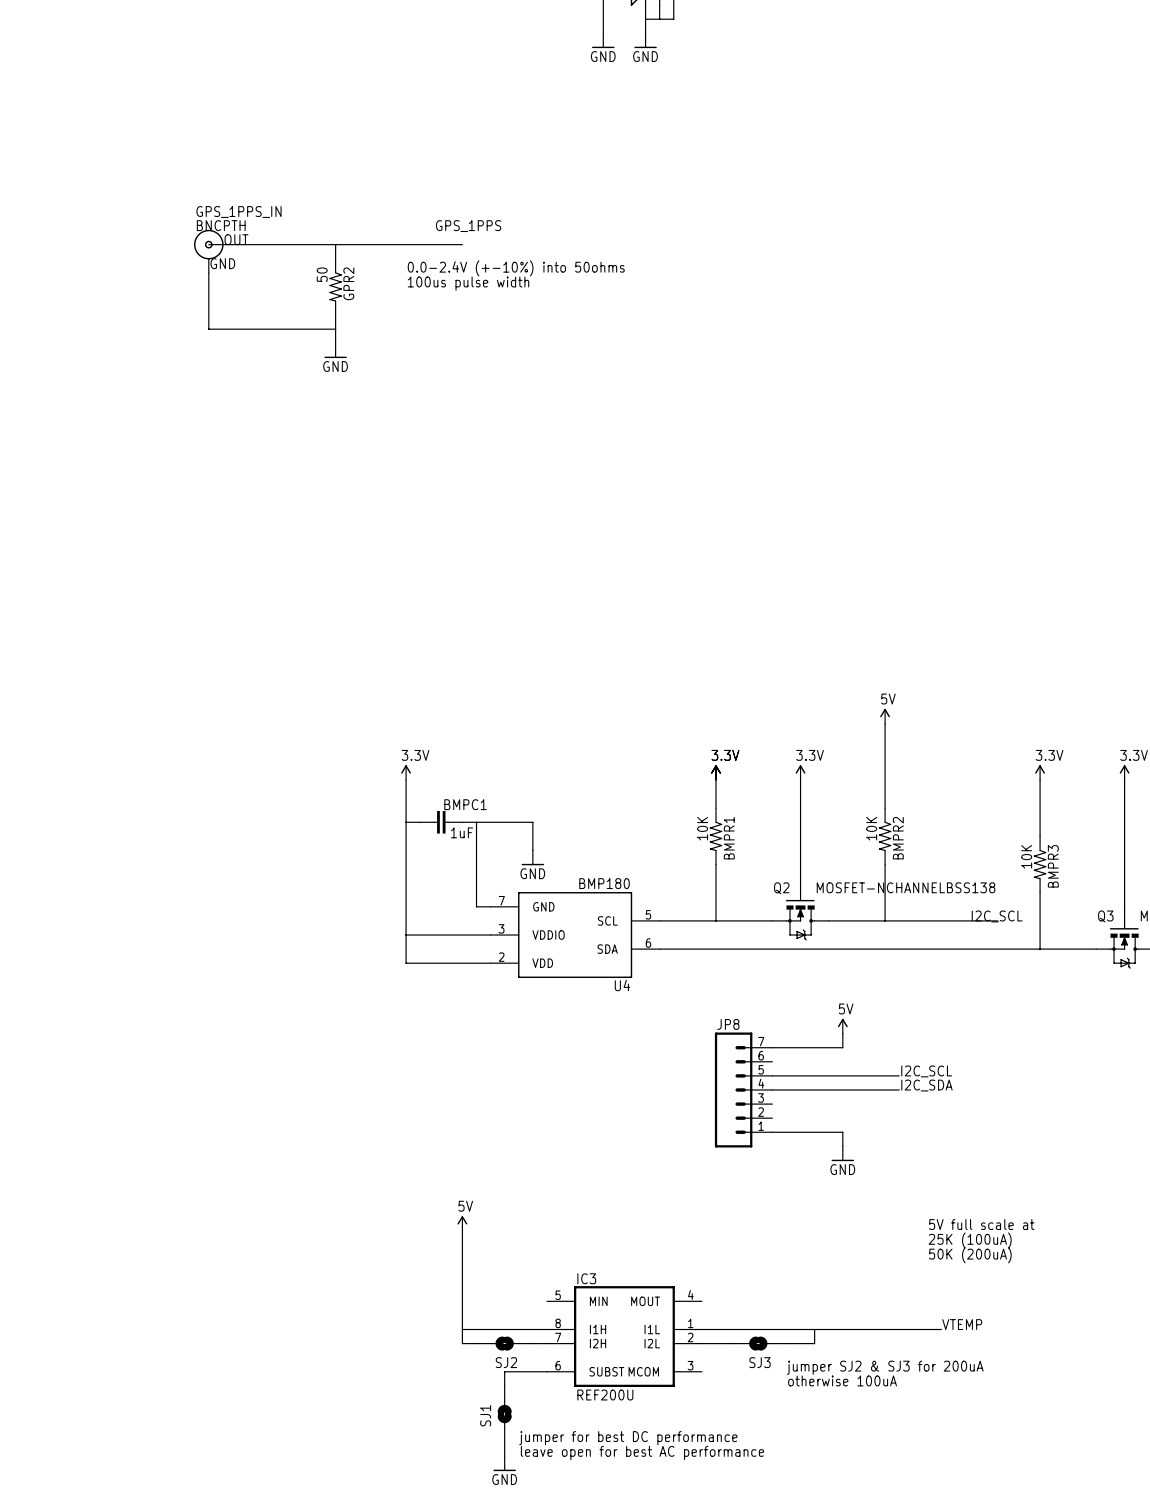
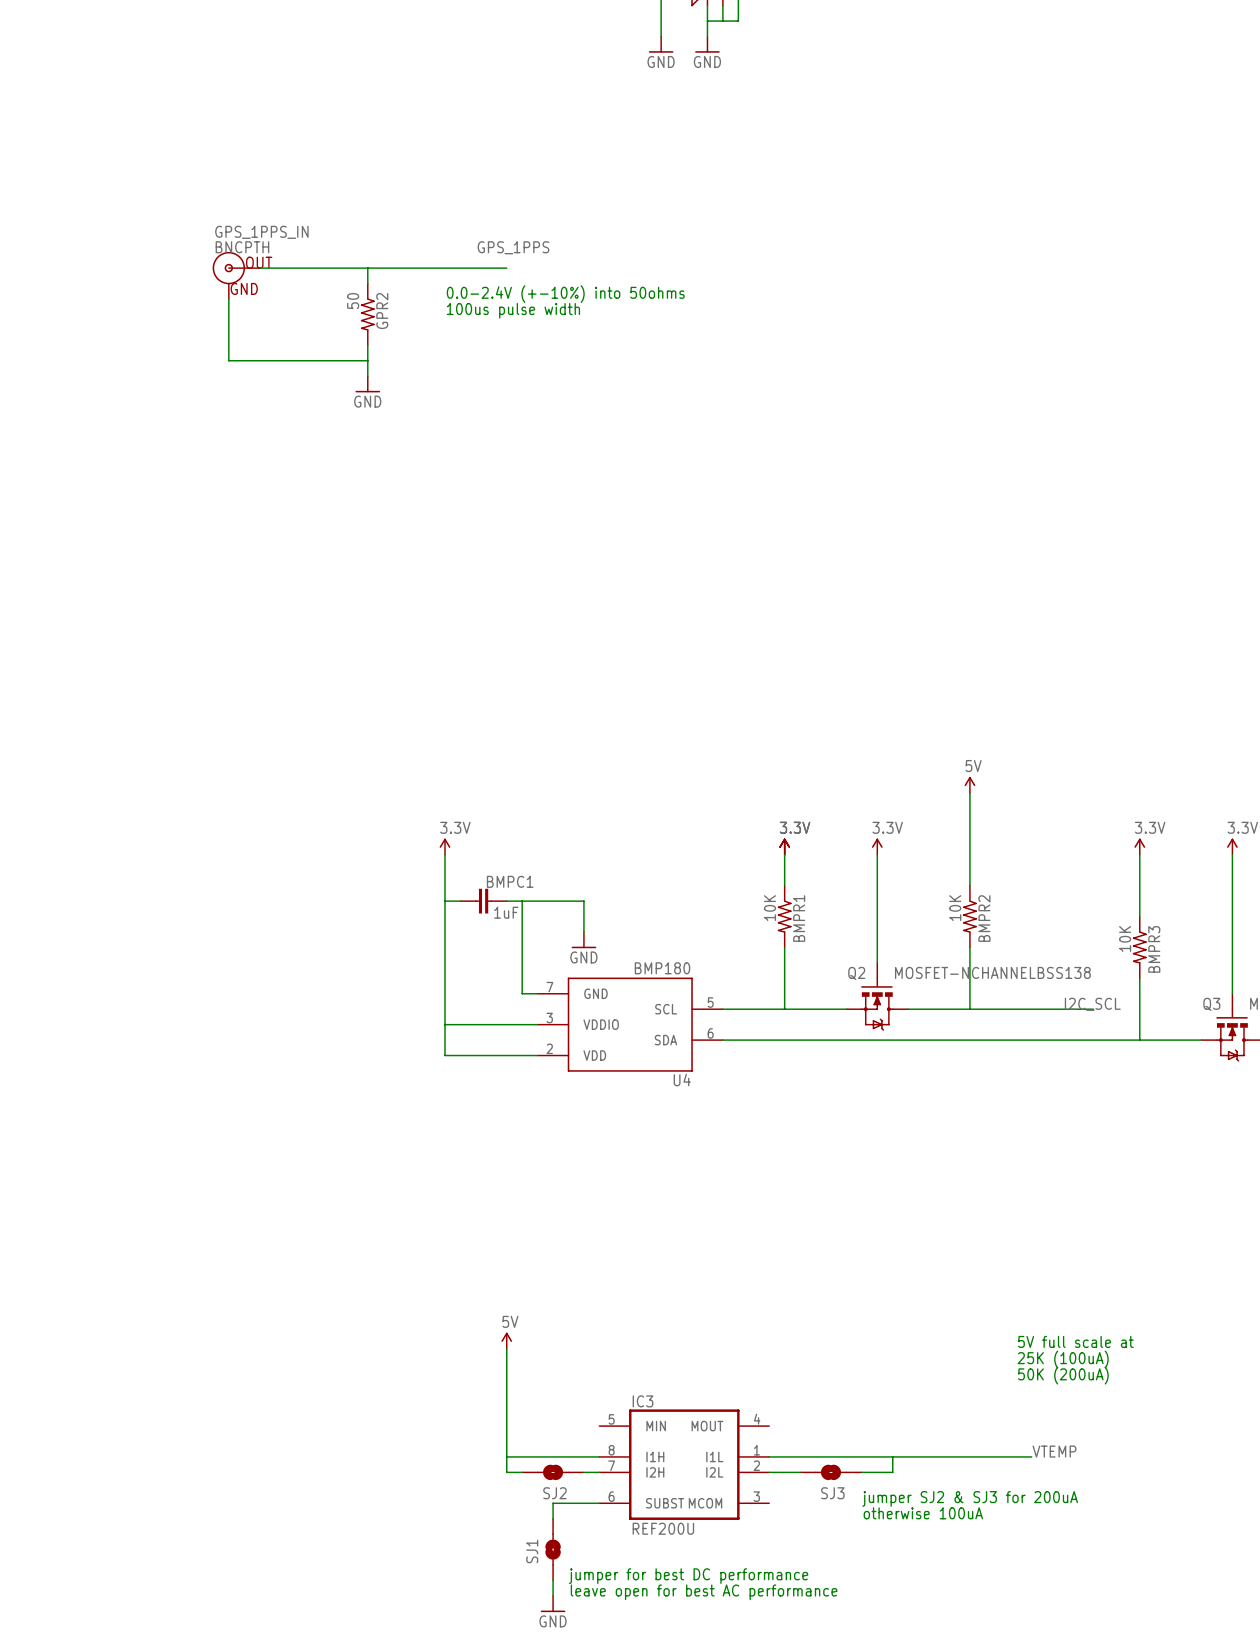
power symbol: 5V (842, 1026) -> none
wire: (842, 1033) (842, 1047) (772, 1047) -> none
label: I2C_SCL (926, 1071) -> none
wire: (772, 1075) (899, 1075) -> none
label: I2C_SDA (926, 1085) -> none
JP8: (743, 1089) -> none
wire: (772, 1089) (899, 1089) -> none
wire: (772, 1132) (842, 1132) (842, 1146) -> none
power symbol: GND (842, 1153) -> none

